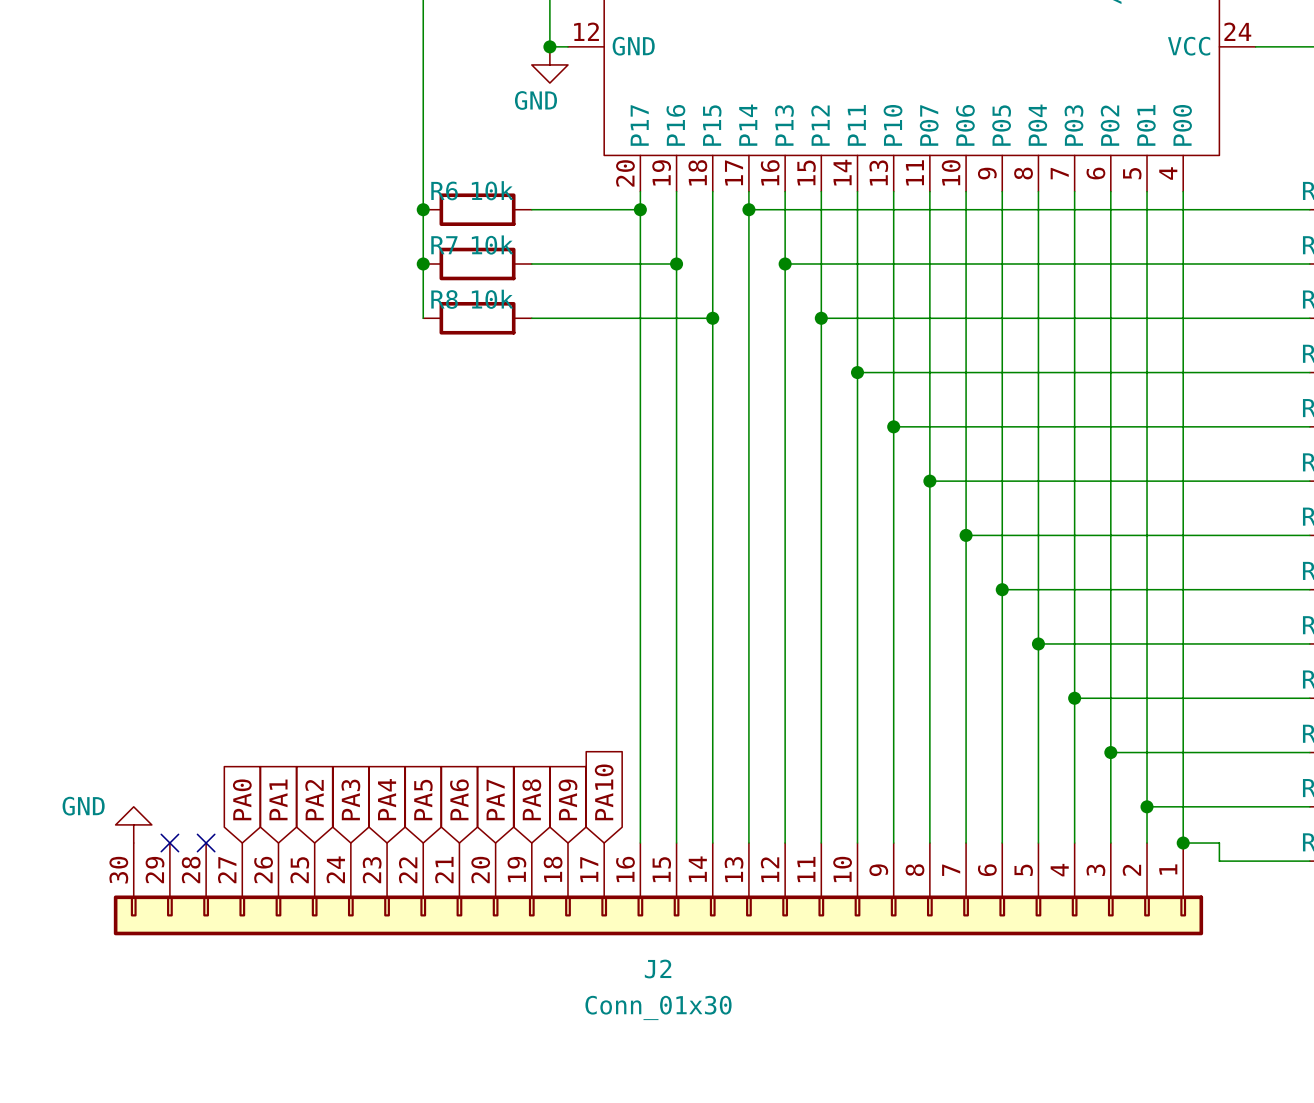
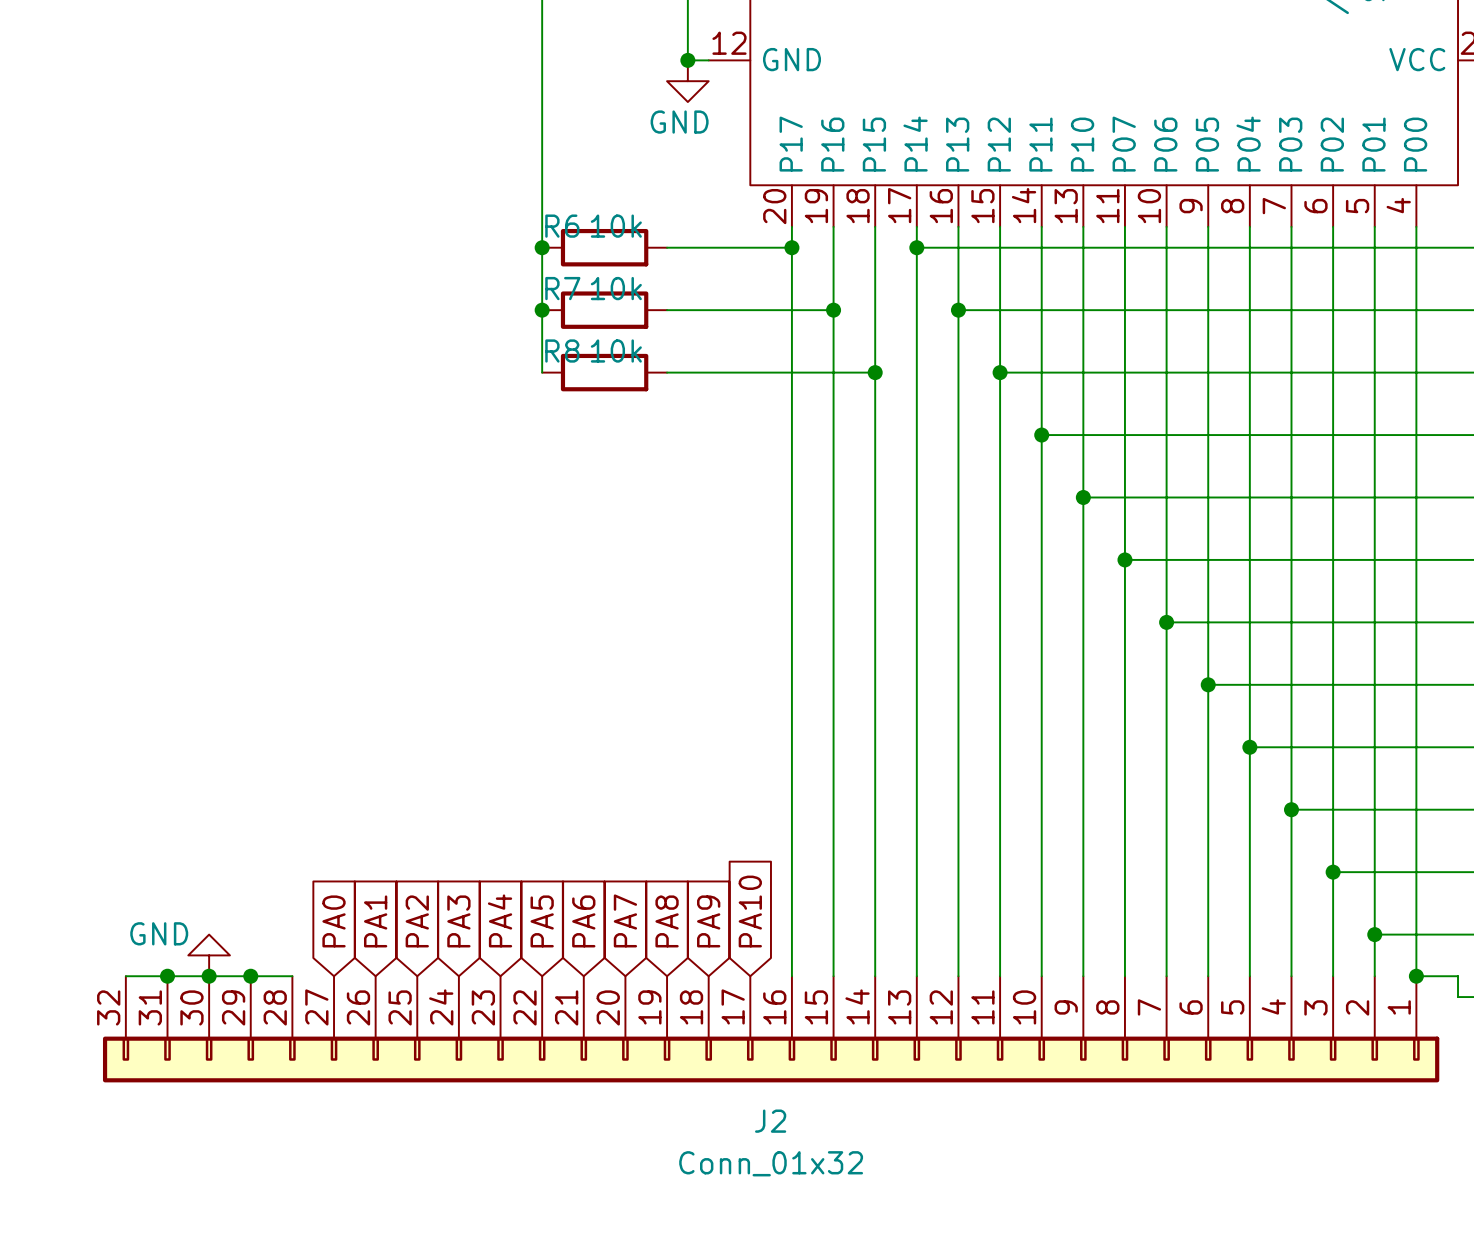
wire: none -> (125, 976) (292, 976)
junction: none -> (167, 976)
J2 symbol: [113, 843, 1204, 936] -> [102, 976, 1440, 1083]
junction: none -> (209, 976)
no-connect mark: (169, 843) -> none
junction: none -> (250, 976)
no-connect mark: (206, 843) -> none
J2 value: Conn_01x30 (658, 1007) -> Conn_01x32 (771, 1163)

